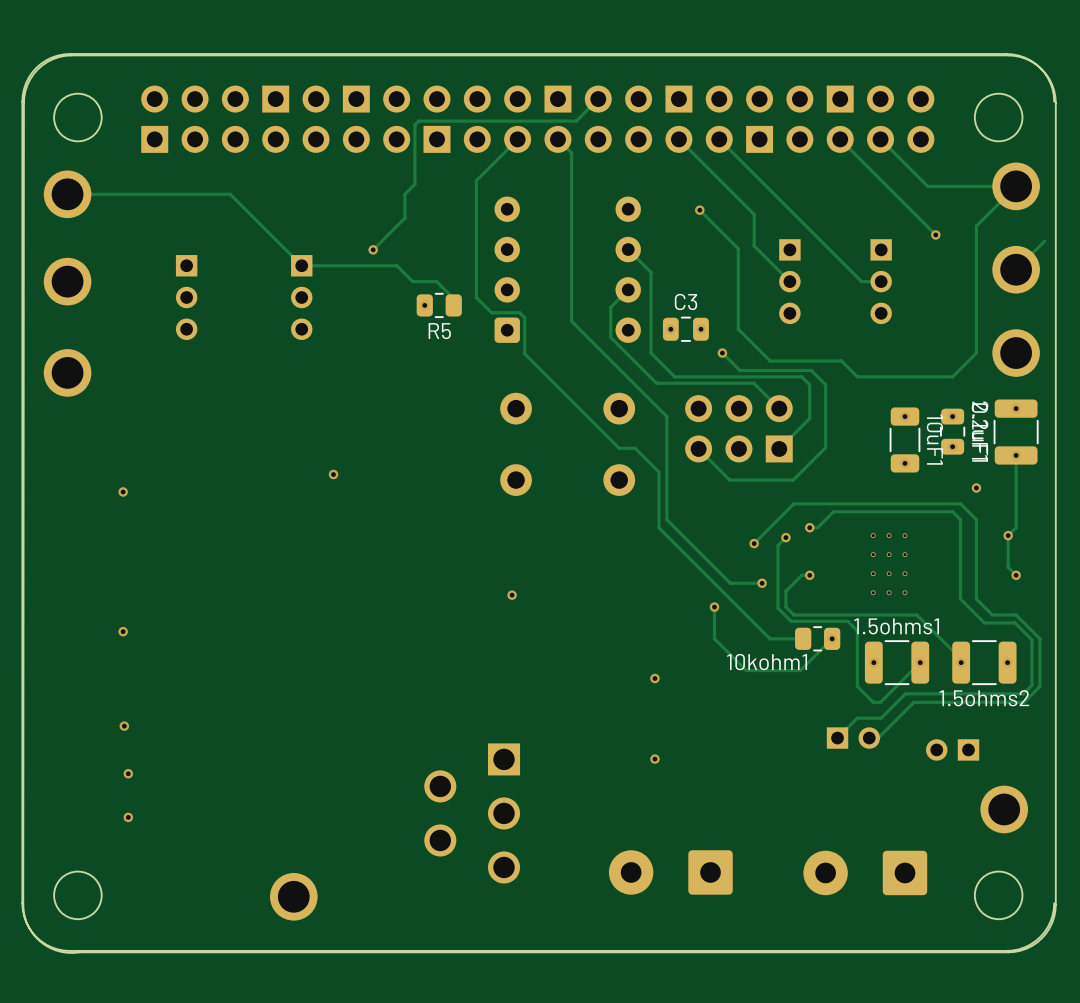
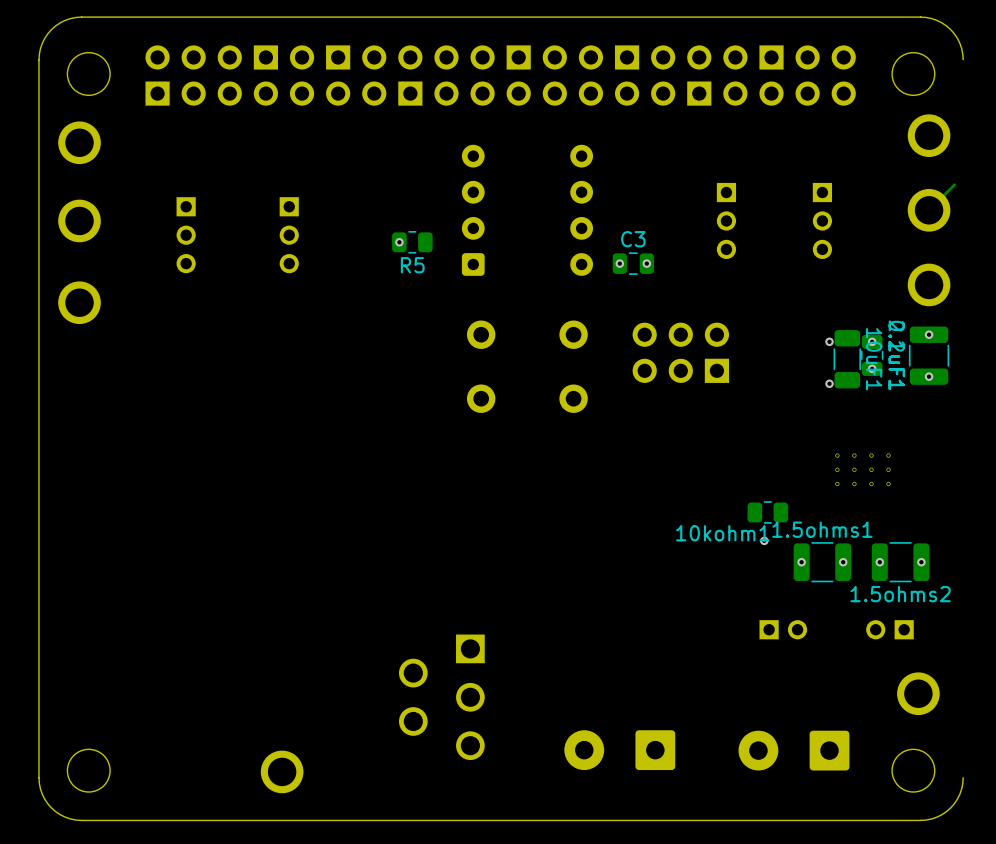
board edge: (1008, 55) (71, 55) (53, 59) (37, 69) (27, 84) (23, 103) (23, 904) (26, 922) (36, 937) (50, 948) (73, 952) (1008, 952) (1026, 948) (1041, 938) (1052, 922) (1055, 904) (1055, 103) (1052, 84) (1041, 69) (1026, 59) (1008, 55) -> none
track: (598, 99) (576, 121) (418, 121) (414, 124) (414, 184) (404, 194) (404, 218) (373, 249) -> none
track: (517, 139) (476, 180) (476, 297) (491, 312) (519, 312) (524, 317) (524, 353) (619, 448) (635, 448) (658, 472) (658, 527) (770, 638) (803, 638) -> none
track: (557, 139) (571, 153) (571, 321) (666, 416) (666, 519) (730, 583) (762, 583) -> none
track: (840, 139) (936, 235) -> none
track: (680, 140) (754, 214) (754, 245) (789, 281) -> none
track: (720, 140) (861, 281) (881, 281) -> none
track: (882, 140) (927, 186) (1016, 186) (976, 226) (976, 353) (952, 376) (857, 376) (841, 361) (770, 361) (738, 329) (738, 248) (699, 210) -> none
track: (67, 194) (230, 194) (301, 265) (396, 265) (412, 281) (436, 281) (453, 298) (453, 305) -> none
via: (699, 210) -> none
via: (935, 234) -> none
via: (373, 249) -> none
track: (628, 249) (650, 272) (650, 353) (674, 376) (801, 376) (809, 384) (809, 418) (779, 448) -> none
part position: (881, 281) -> (822, 220)
track: (628, 289) (610, 307) (610, 337) (656, 383) (753, 383) (779, 408) -> none
track: (722, 353) (739, 370) (811, 370) (825, 384) (825, 447) (793, 480) (729, 480) (698, 448) -> none
via: (722, 353) -> none
10uF1 position: (904, 439) -> (847, 359)
track: (1016, 455) (1016, 527) (1008, 535) (1008, 567) (1016, 575) -> none
via: (333, 474) -> none
via: (976, 488) -> none
via: (123, 491) -> none
track: (809, 527) (817, 527) (833, 511) (952, 511) (960, 519) (960, 599) (984, 622) (1015, 622) (1031, 639) (1031, 685) (1023, 693) (905, 693) (881, 718) (857, 718) (837, 738) -> none
via: (809, 527) -> none
via: (1008, 535) -> none
track: (785, 537) (777, 545) (777, 608) (791, 621) (847, 621) (857, 630) (857, 686) (873, 702) (880, 702) (920, 662) -> none
via: (785, 537) -> none
track: (754, 543) (793, 503) (960, 503) (976, 519) (976, 599) (992, 615) (1016, 615) (1039, 638) (1039, 686) (1024, 702) (913, 702) (878, 738) (869, 738) -> none
via: (754, 543) -> none
part rotation: 0° (889, 564) -> 90° clockwise (862, 469)
part position: (889, 564) -> (862, 469)
track: (809, 575) (801, 575) (785, 591) (785, 607) (793, 615) (916, 615) (961, 659) (961, 662) -> none
via: (809, 575) -> none
via: (1016, 575) -> none
via: (762, 583) -> none
via: (512, 595) -> none
track: (714, 607) (714, 638) (746, 670) (800, 670) (832, 638) -> none
via: (714, 607) -> none
via: (123, 631) -> none
10kohm1 position: (817, 638) -> (767, 512)
via: (654, 678) -> none
via: (124, 726) -> none
part position: (952, 749) -> (889, 629)
via: (654, 759) -> none
via: (128, 773) -> none
via: (128, 817) -> none

